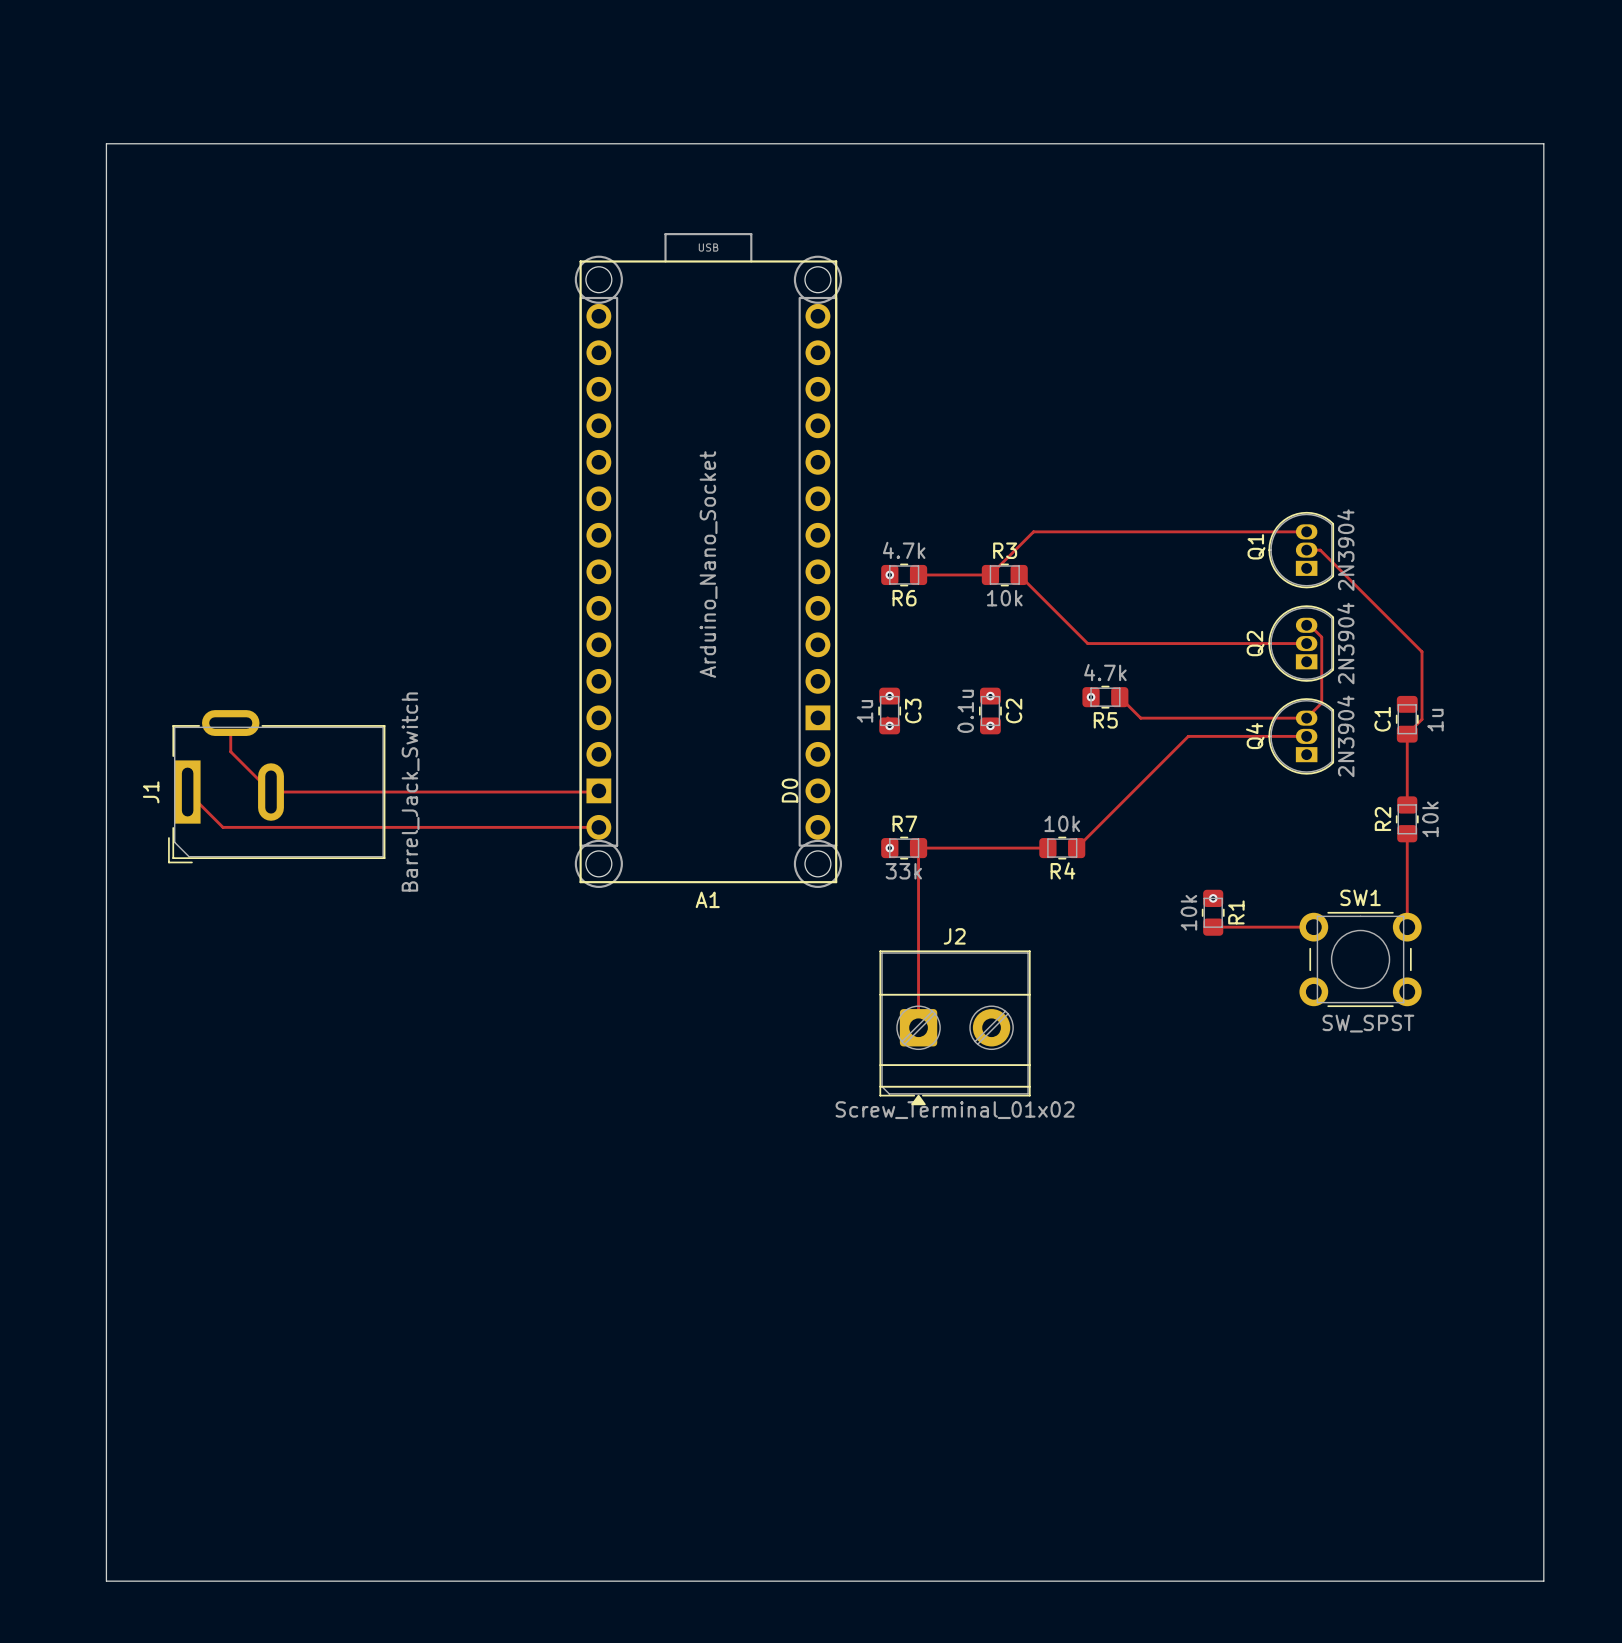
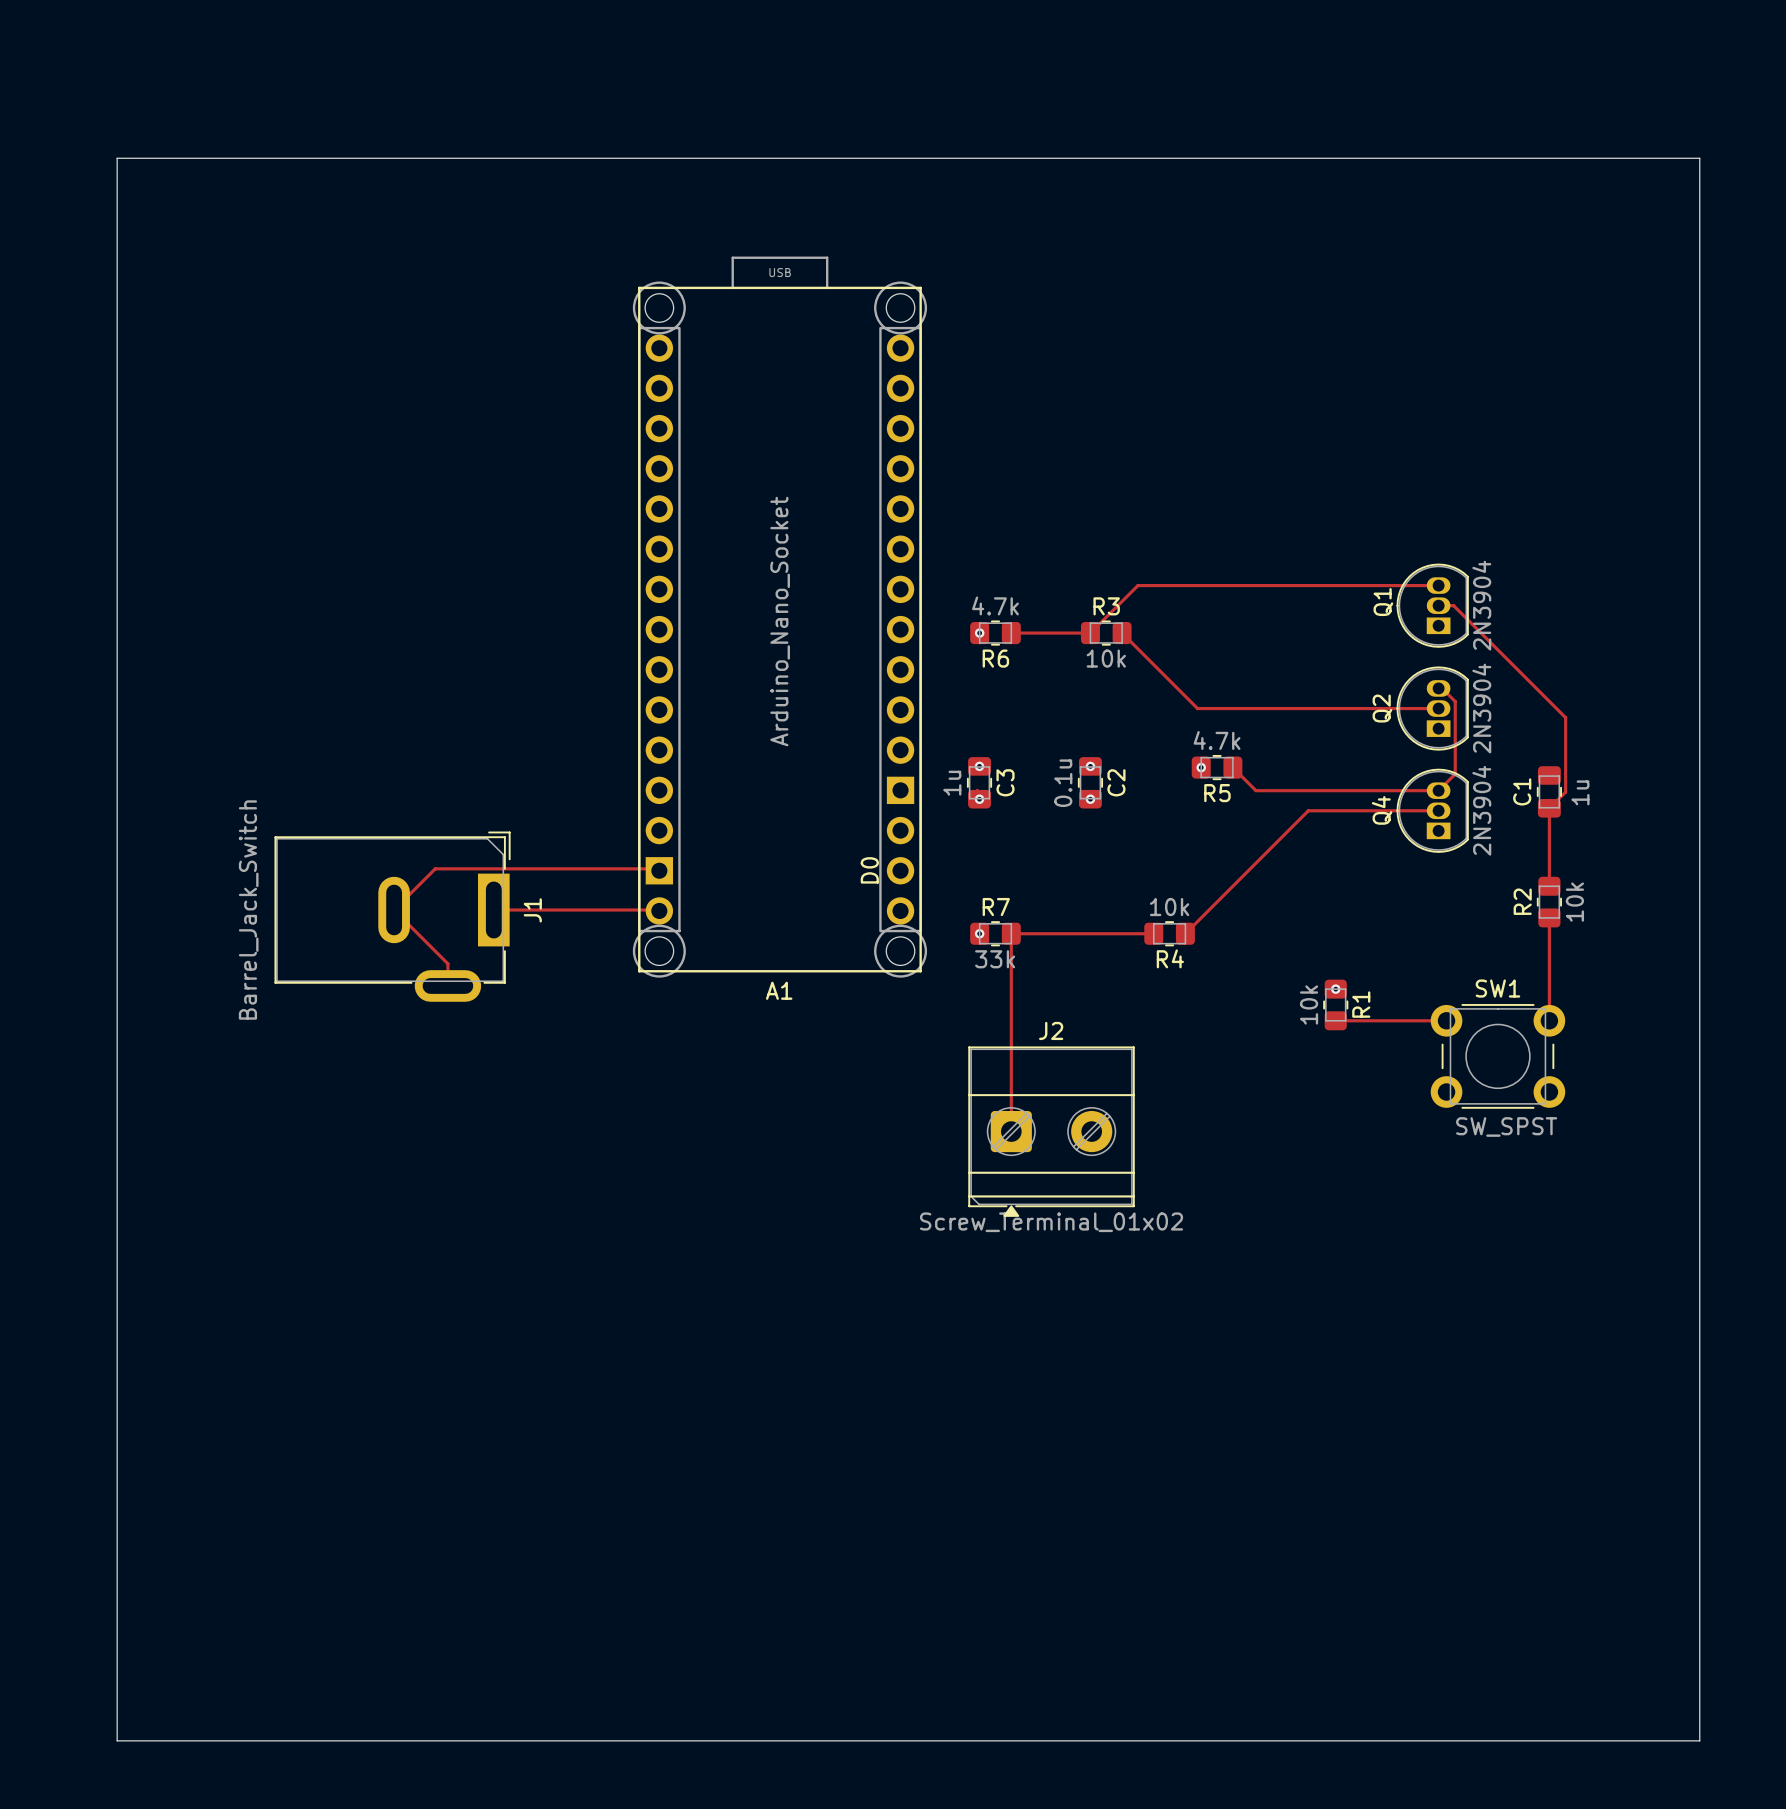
J1 footprint: [168, 710, 386, 864] -> [274, 831, 511, 1002]
track: (230, 723) (230, 751) (271, 792) (597, 792) -> none
track: none -> (659, 870) (657, 868) (435, 868) (394, 910) (447, 963) (447, 985)
J1 name position: J1 (151, 792) -> J1 (532, 910)
track: (187, 792) (222, 827) (598, 827) -> (493, 910) (659, 910)
J1 value position: Barrel_Jack_Switch (410, 792) -> Barrel_Jack_Switch (248, 910)

